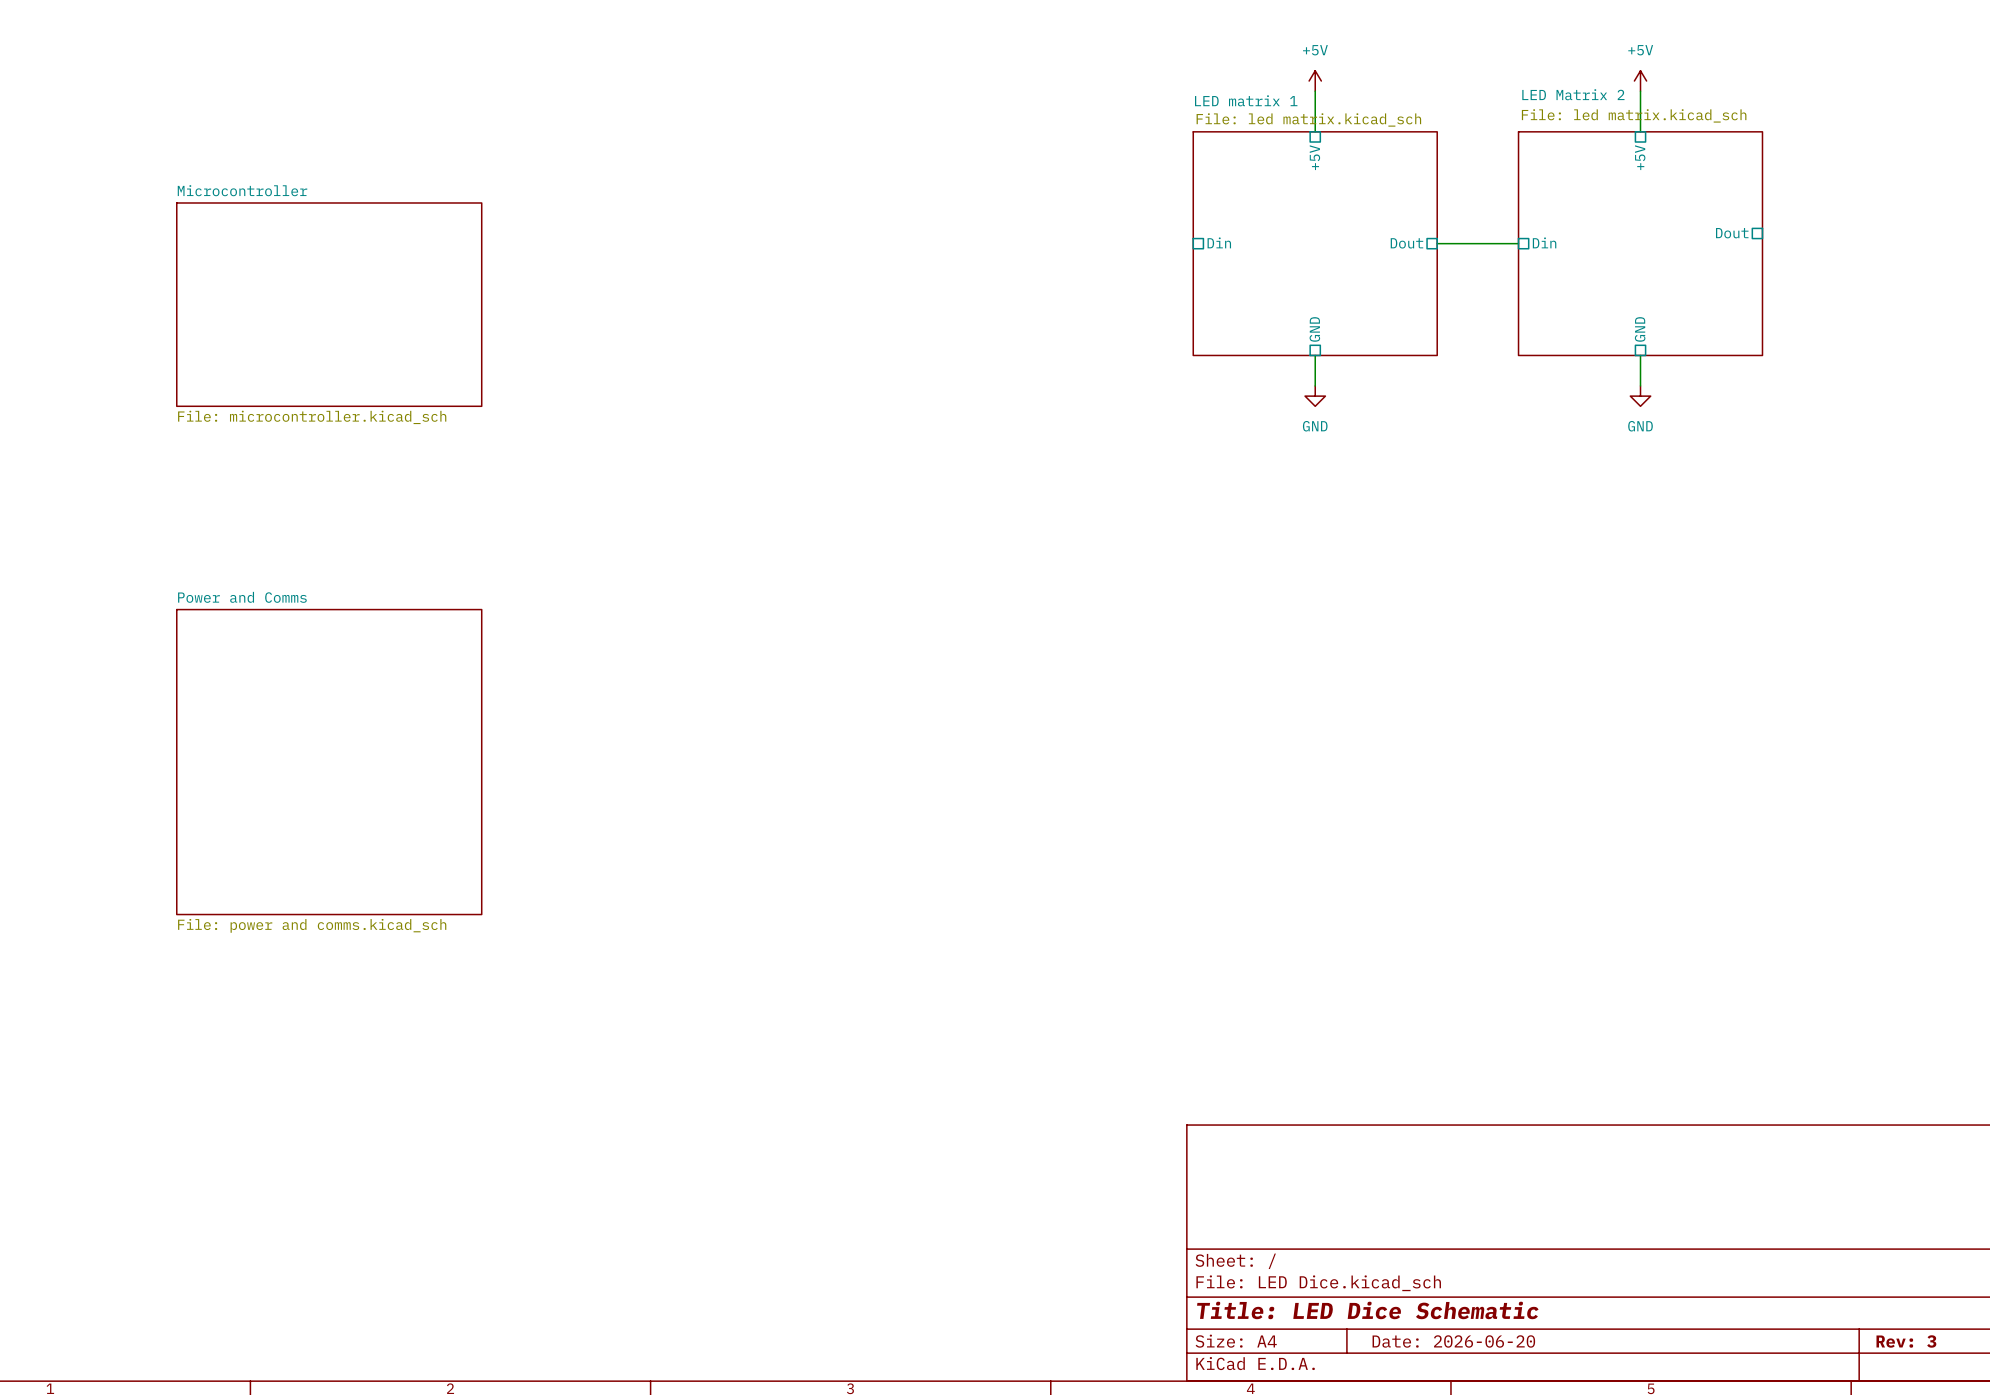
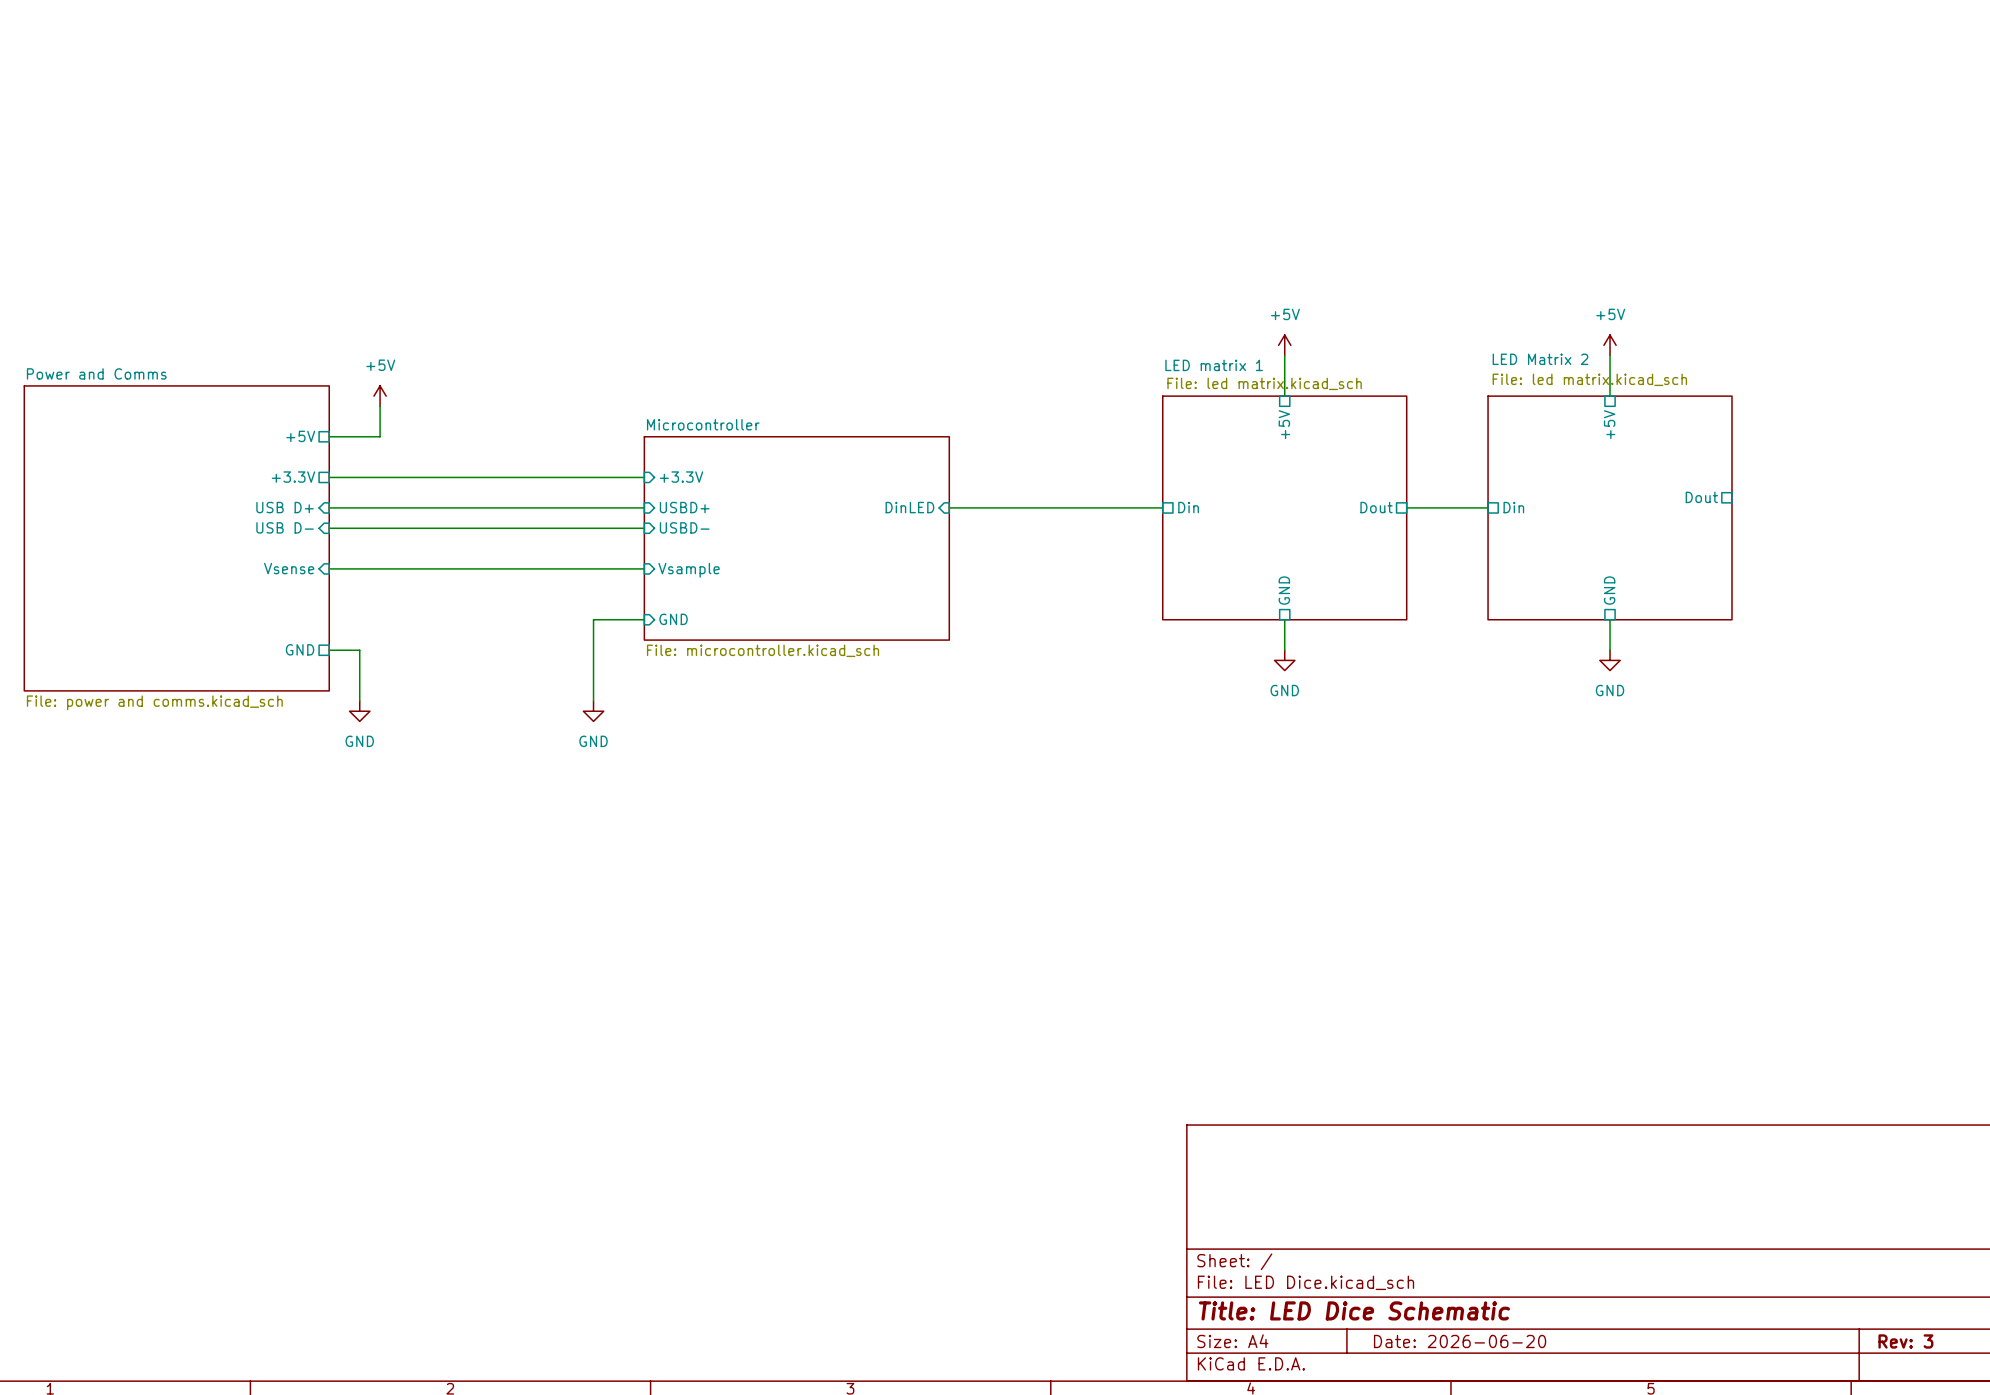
power symbol: +5V (1315, 81) -> none
power symbol: +5V (1640, 81) -> none
wire: (1315, 91) (1315, 131) -> none
wire: (1640, 91) (1640, 131) -> none
sheet pin: +5V (1314, 157) -> none
sheet pin: +5V (1640, 157) -> none
sheet pin: Dout (1732, 233) -> none
sheet pin: Din (1219, 242) -> none
sheet pin: Din (1544, 242) -> none
sheet LED matrix 1 position: (1315, 243) -> (1284, 507)
sheet pin: Dout (1406, 243) -> none
wire: (1437, 243) (1518, 243) -> none
sheet LED Matrix 2 position: (1640, 243) -> (1610, 507)
sheet Microcontroller: File: microcontroller.kicad_sch (329, 304) -> none
sheet pin: GND (1314, 329) -> none
sheet pin: GND (1640, 329) -> none
power symbol: none -> +5V (1284, 345)
power symbol: none -> +5V (1610, 345)
wire: none -> (1284, 355) (1284, 396)
wire: (1315, 355) (1315, 385) -> none
wire: none -> (1610, 355) (1610, 396)
wire: (1640, 355) (1640, 385) -> none
power symbol: none -> +5V (380, 396)
power symbol: GND (1315, 396) -> none
power symbol: GND (1640, 396) -> none
wire: none -> (380, 406) (380, 436) (329, 436)
sheet pin: none -> +5V (1284, 424)
sheet pin: none -> +5V (1609, 424)
sheet pin: none -> +5V (300, 436)
sheet pin: none -> +3.3V (293, 477)
wire: none -> (329, 477) (644, 477)
sheet pin: none -> +3.3V (681, 477)
sheet pin: none -> Dout (1701, 497)
sheet pin: none -> USB D+ (285, 507)
wire: none -> (329, 507) (644, 507)
sheet pin: none -> USBD+ (684, 507)
sheet pin: none -> DinLED (909, 507)
wire: none -> (949, 507) (1162, 507)
sheet pin: none -> Din (1188, 507)
sheet pin: none -> Dout (1376, 507)
wire: none -> (1406, 507) (1488, 507)
sheet pin: none -> Din (1513, 507)
sheet pin: none -> USB D- (285, 527)
sheet pin: none -> USBD- (684, 527)
wire: none -> (329, 528) (644, 528)
sheet Power and Comms: none -> File: power and comms.kicad_sch (176, 538)
sheet Microcontroller: none -> File: microcontroller.kicad_sch (796, 538)
sheet pin: none -> Vsense (289, 568)
wire: none -> (329, 568) (644, 568)
sheet pin: none -> Vsample (689, 570)
sheet pin: none -> GND (1284, 590)
sheet pin: none -> GND (1609, 590)
wire: none -> (644, 619) (593, 619) (593, 701)
sheet pin: none -> GND (673, 619)
wire: none -> (1284, 619) (1284, 650)
wire: none -> (1610, 619) (1610, 650)
sheet pin: none -> GND (300, 649)
wire: none -> (329, 650) (359, 650) (359, 701)
power symbol: none -> GND (1284, 660)
power symbol: none -> GND (1610, 660)
power symbol: none -> GND (359, 711)
power symbol: none -> GND (593, 711)
sheet Power and Comms: File: power and comms.kicad_sch (329, 762) -> none

